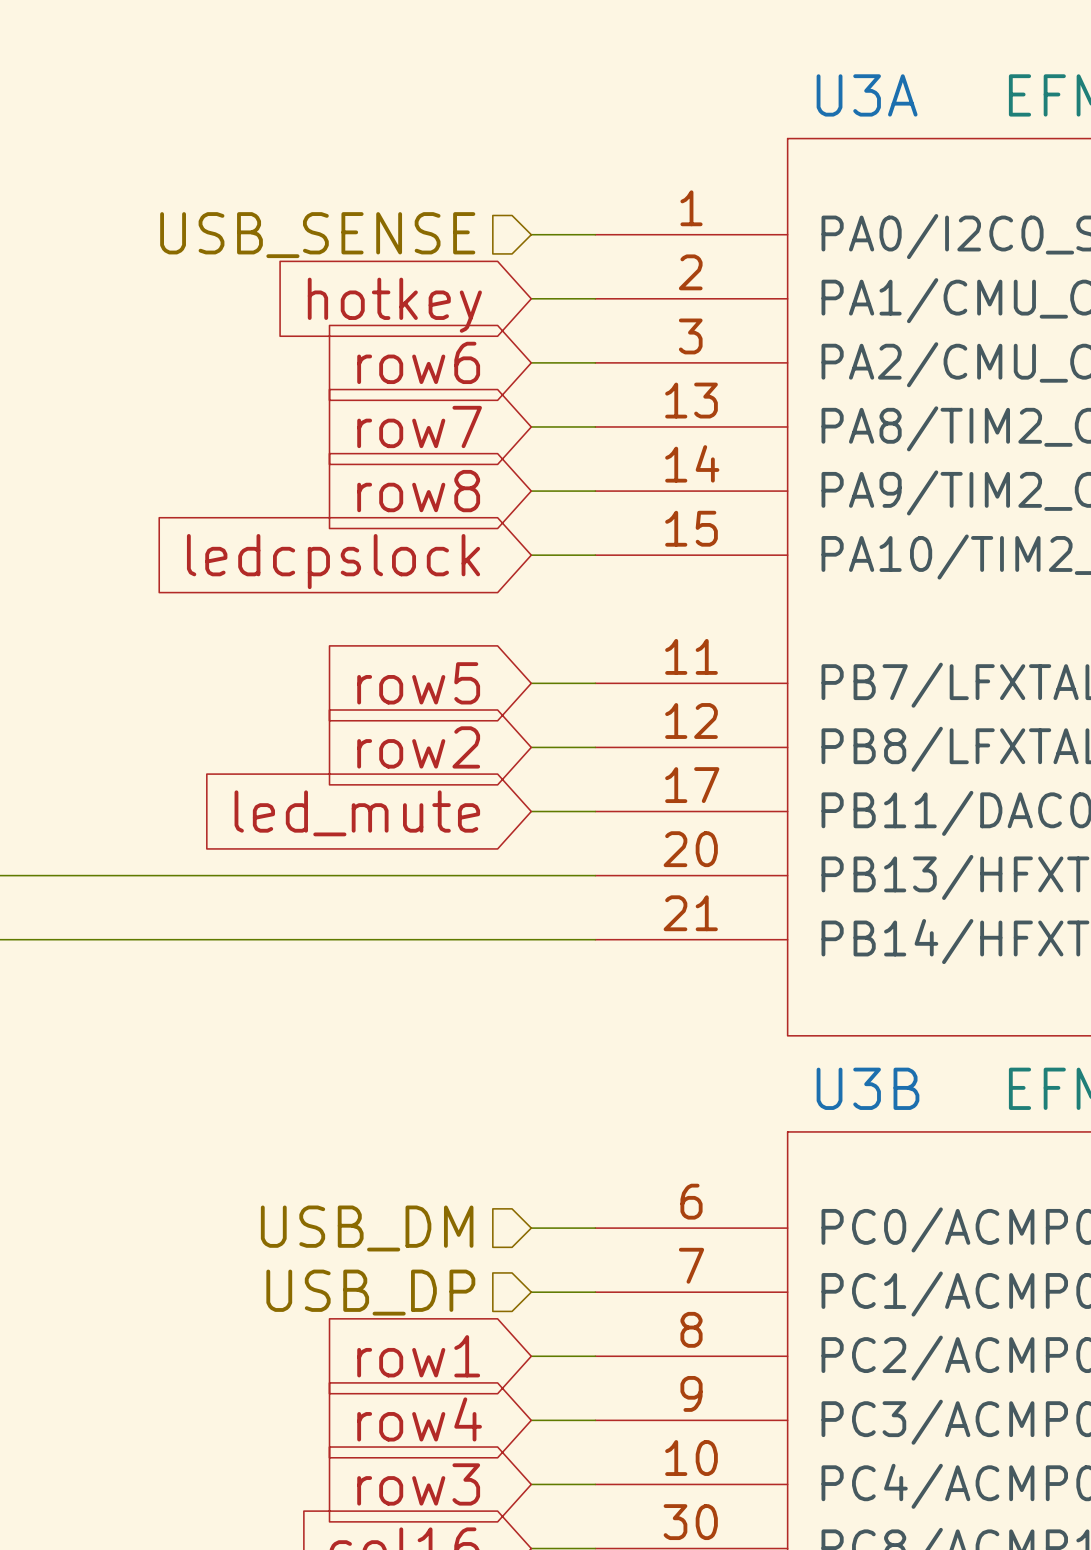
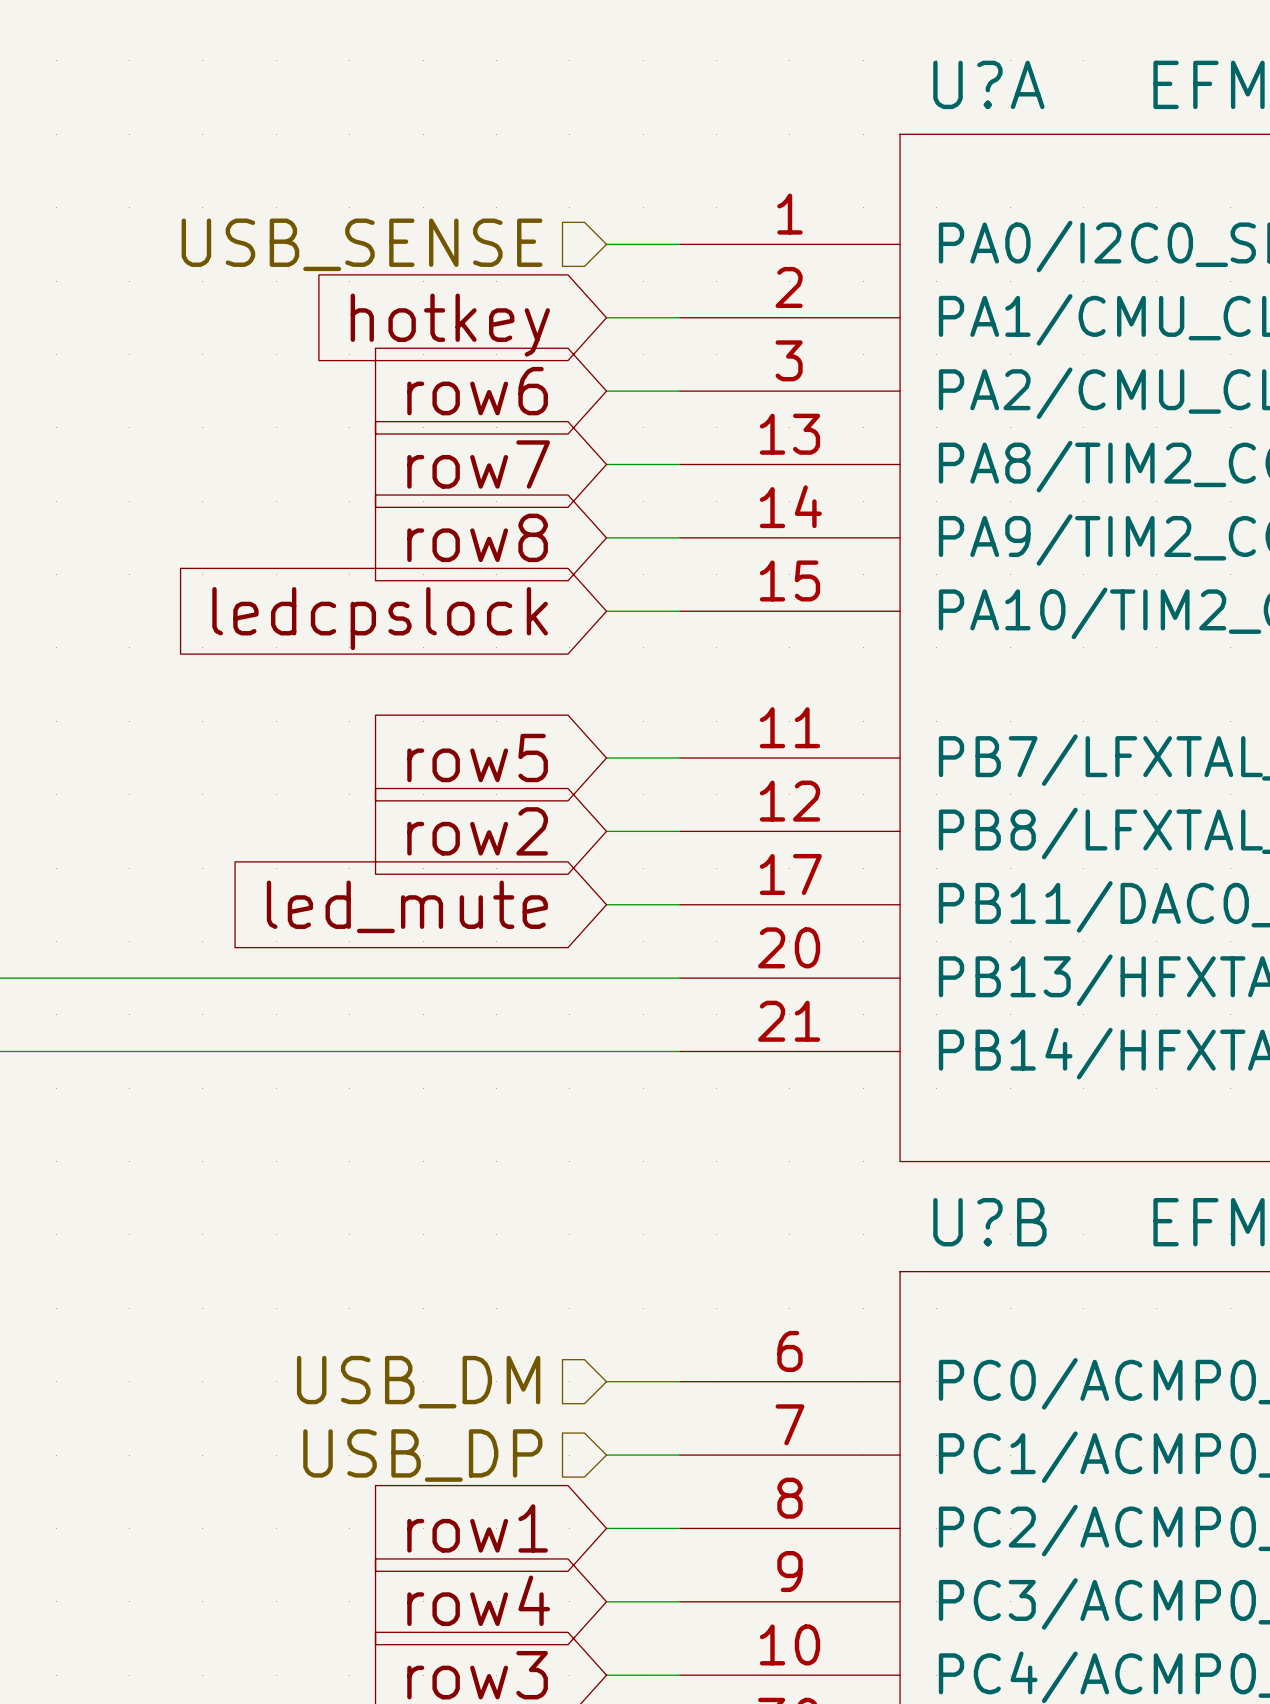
U3A name: U3A (867, 95) -> U?A (988, 84)
U3B name: U3B (867, 1088) -> U?B (989, 1222)

